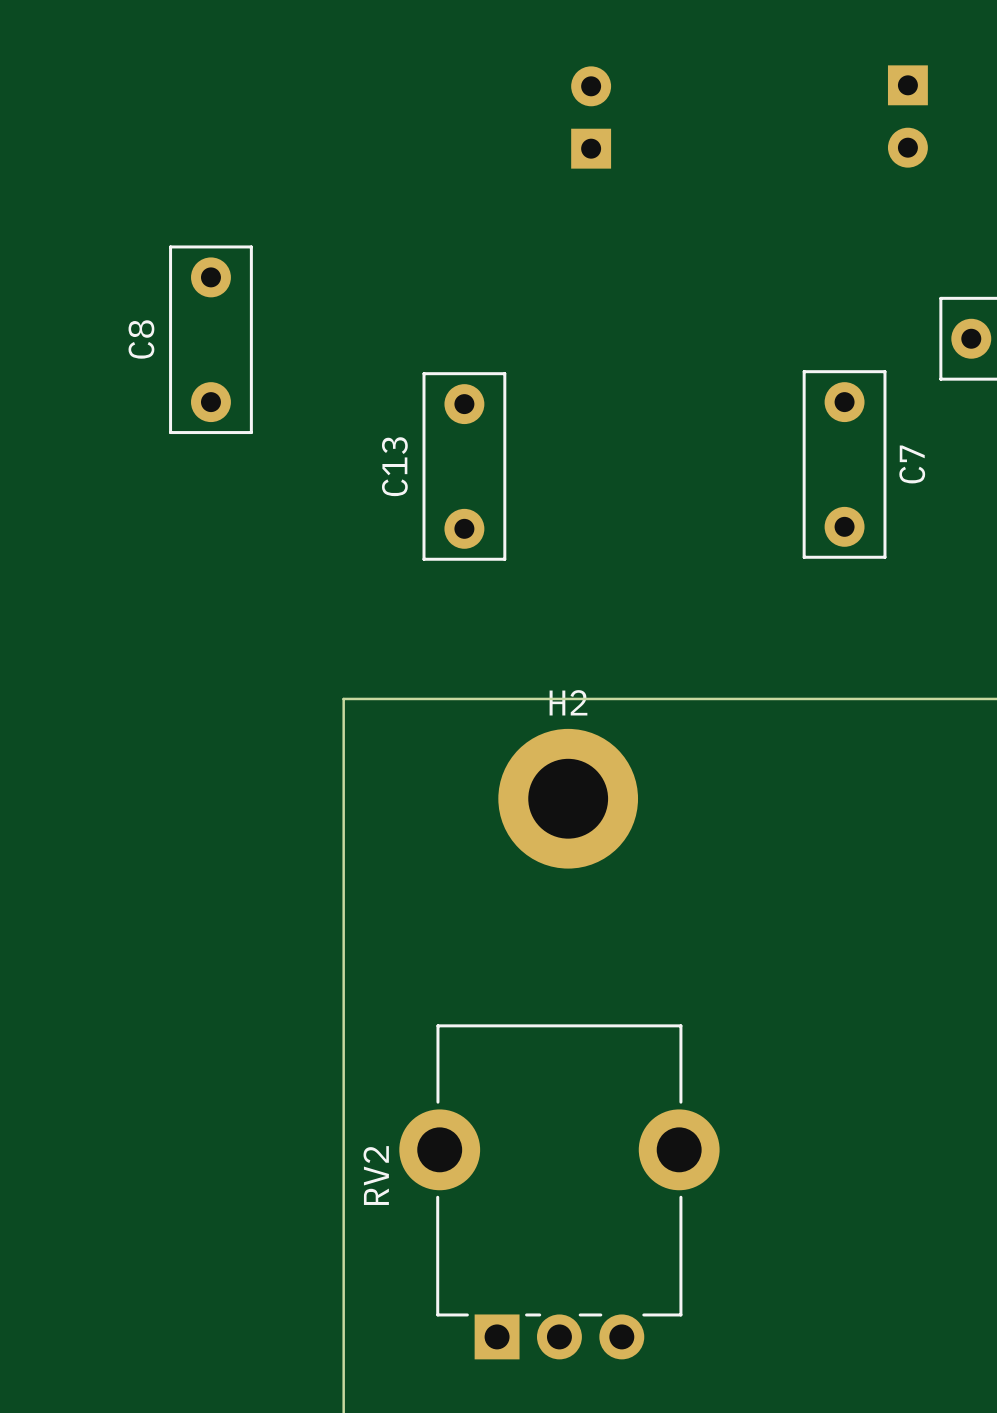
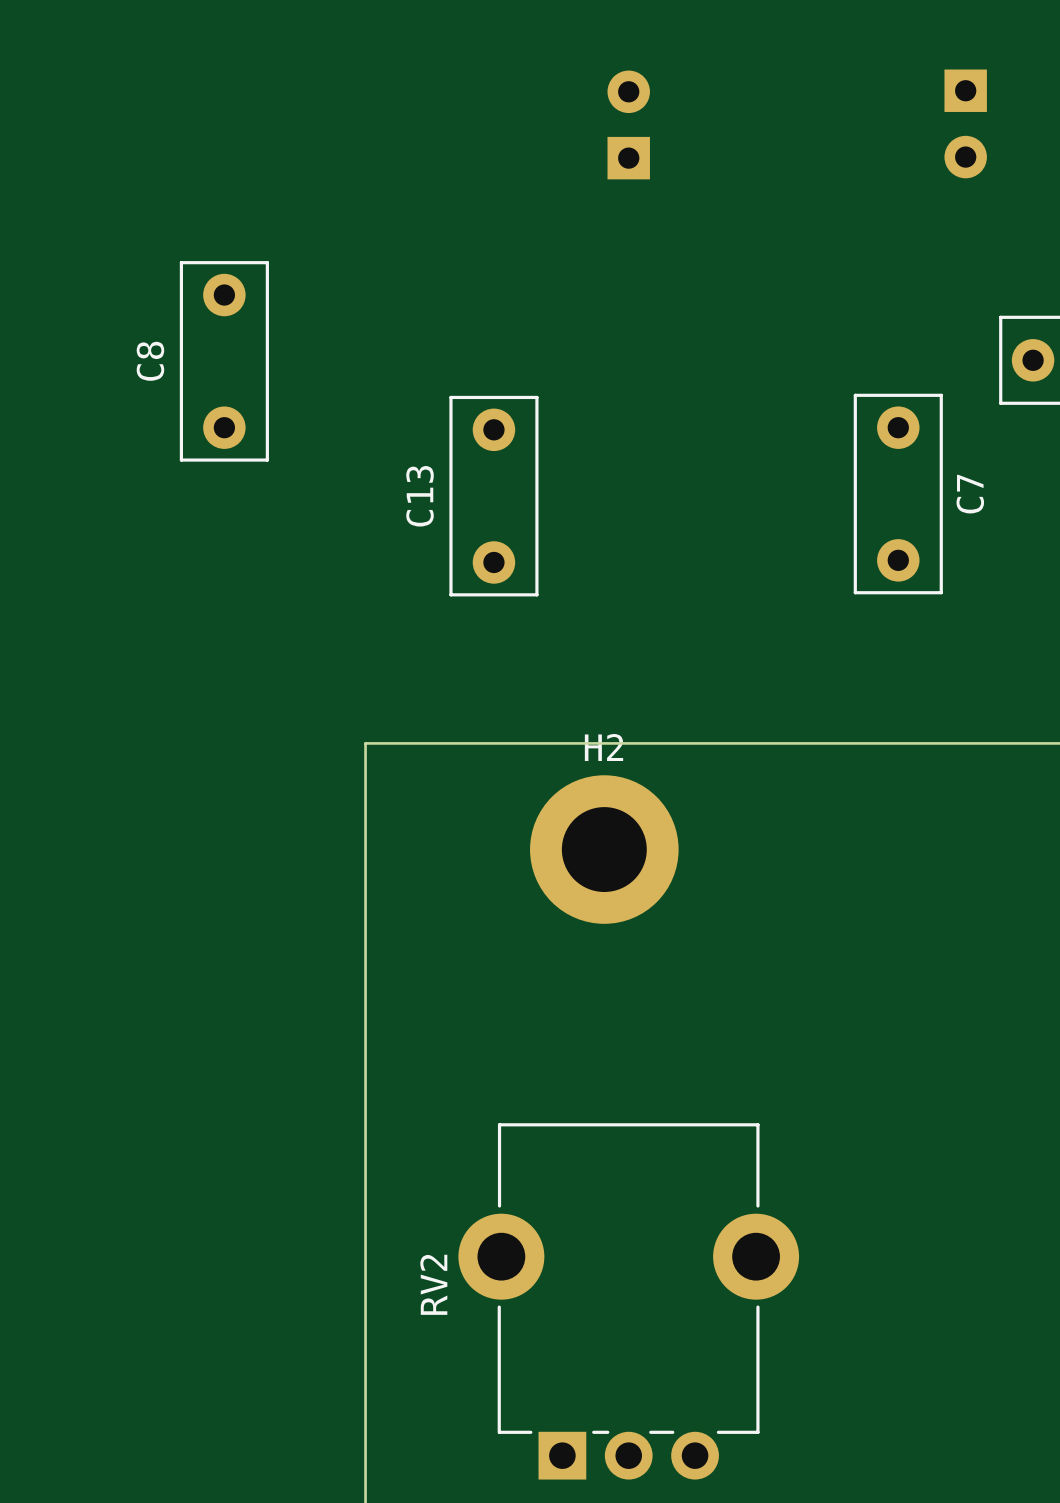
RV2 position: (559, 1191) -> (628, 1301)

